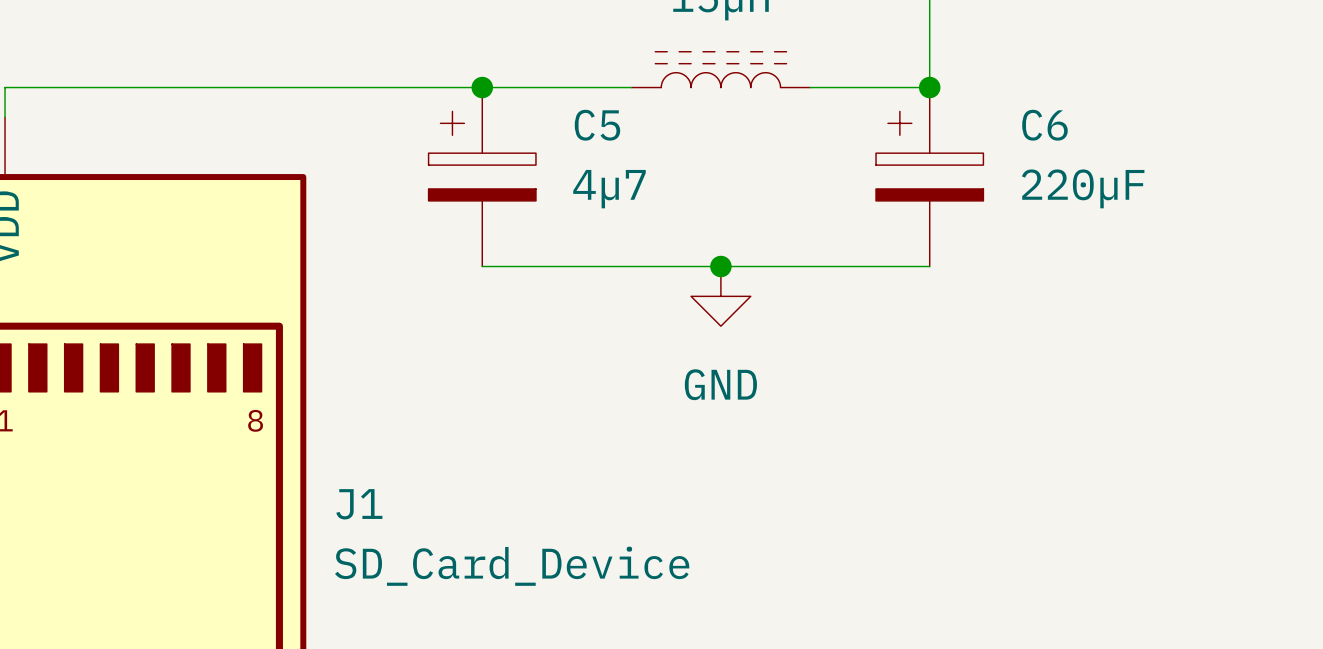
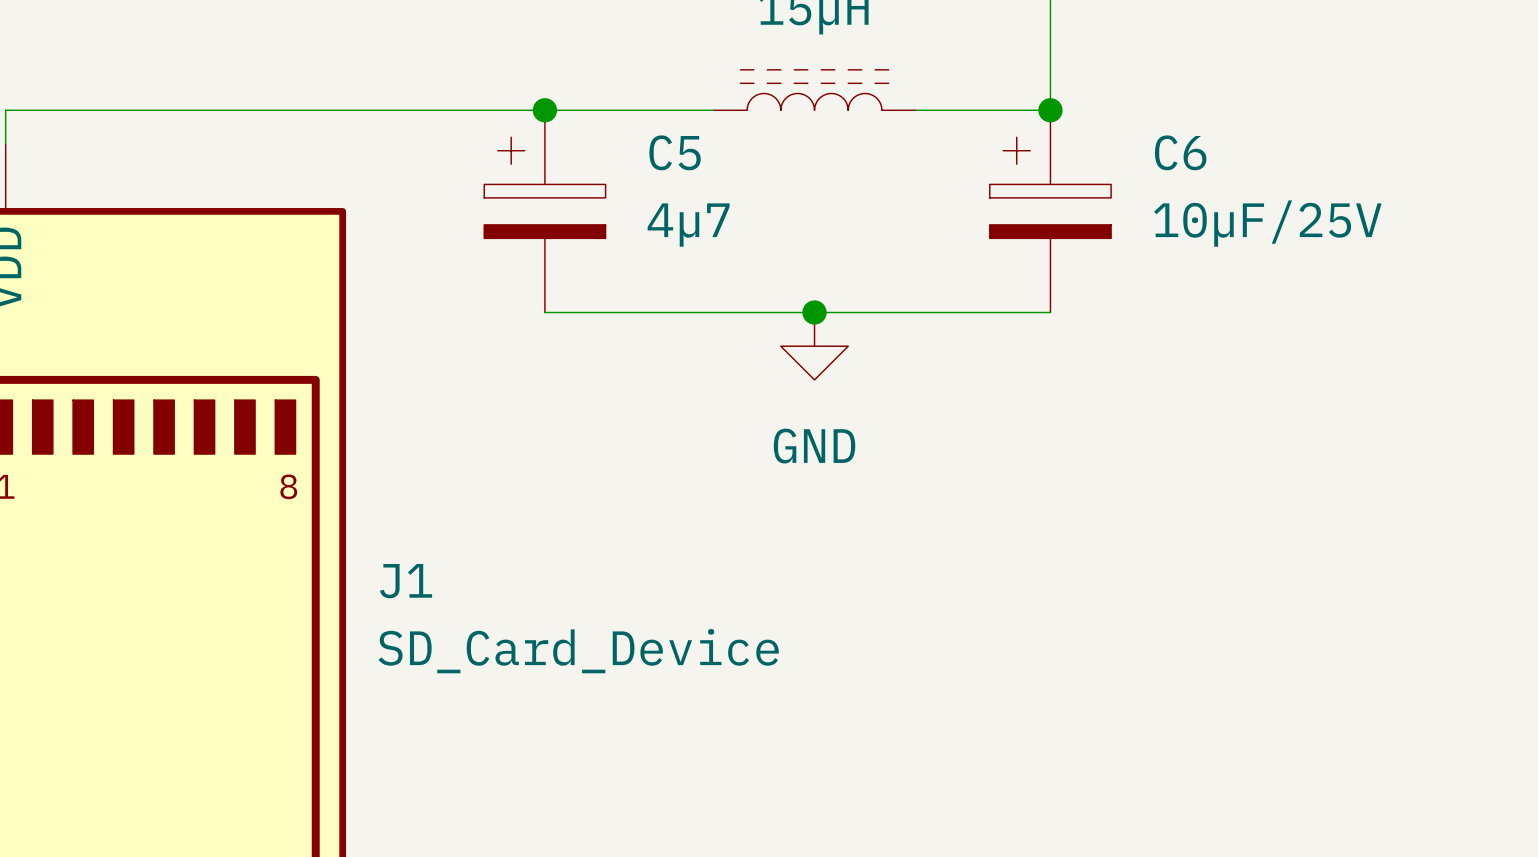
C6 value: 220µF (1083, 188) -> 10µF/25V (1267, 223)

